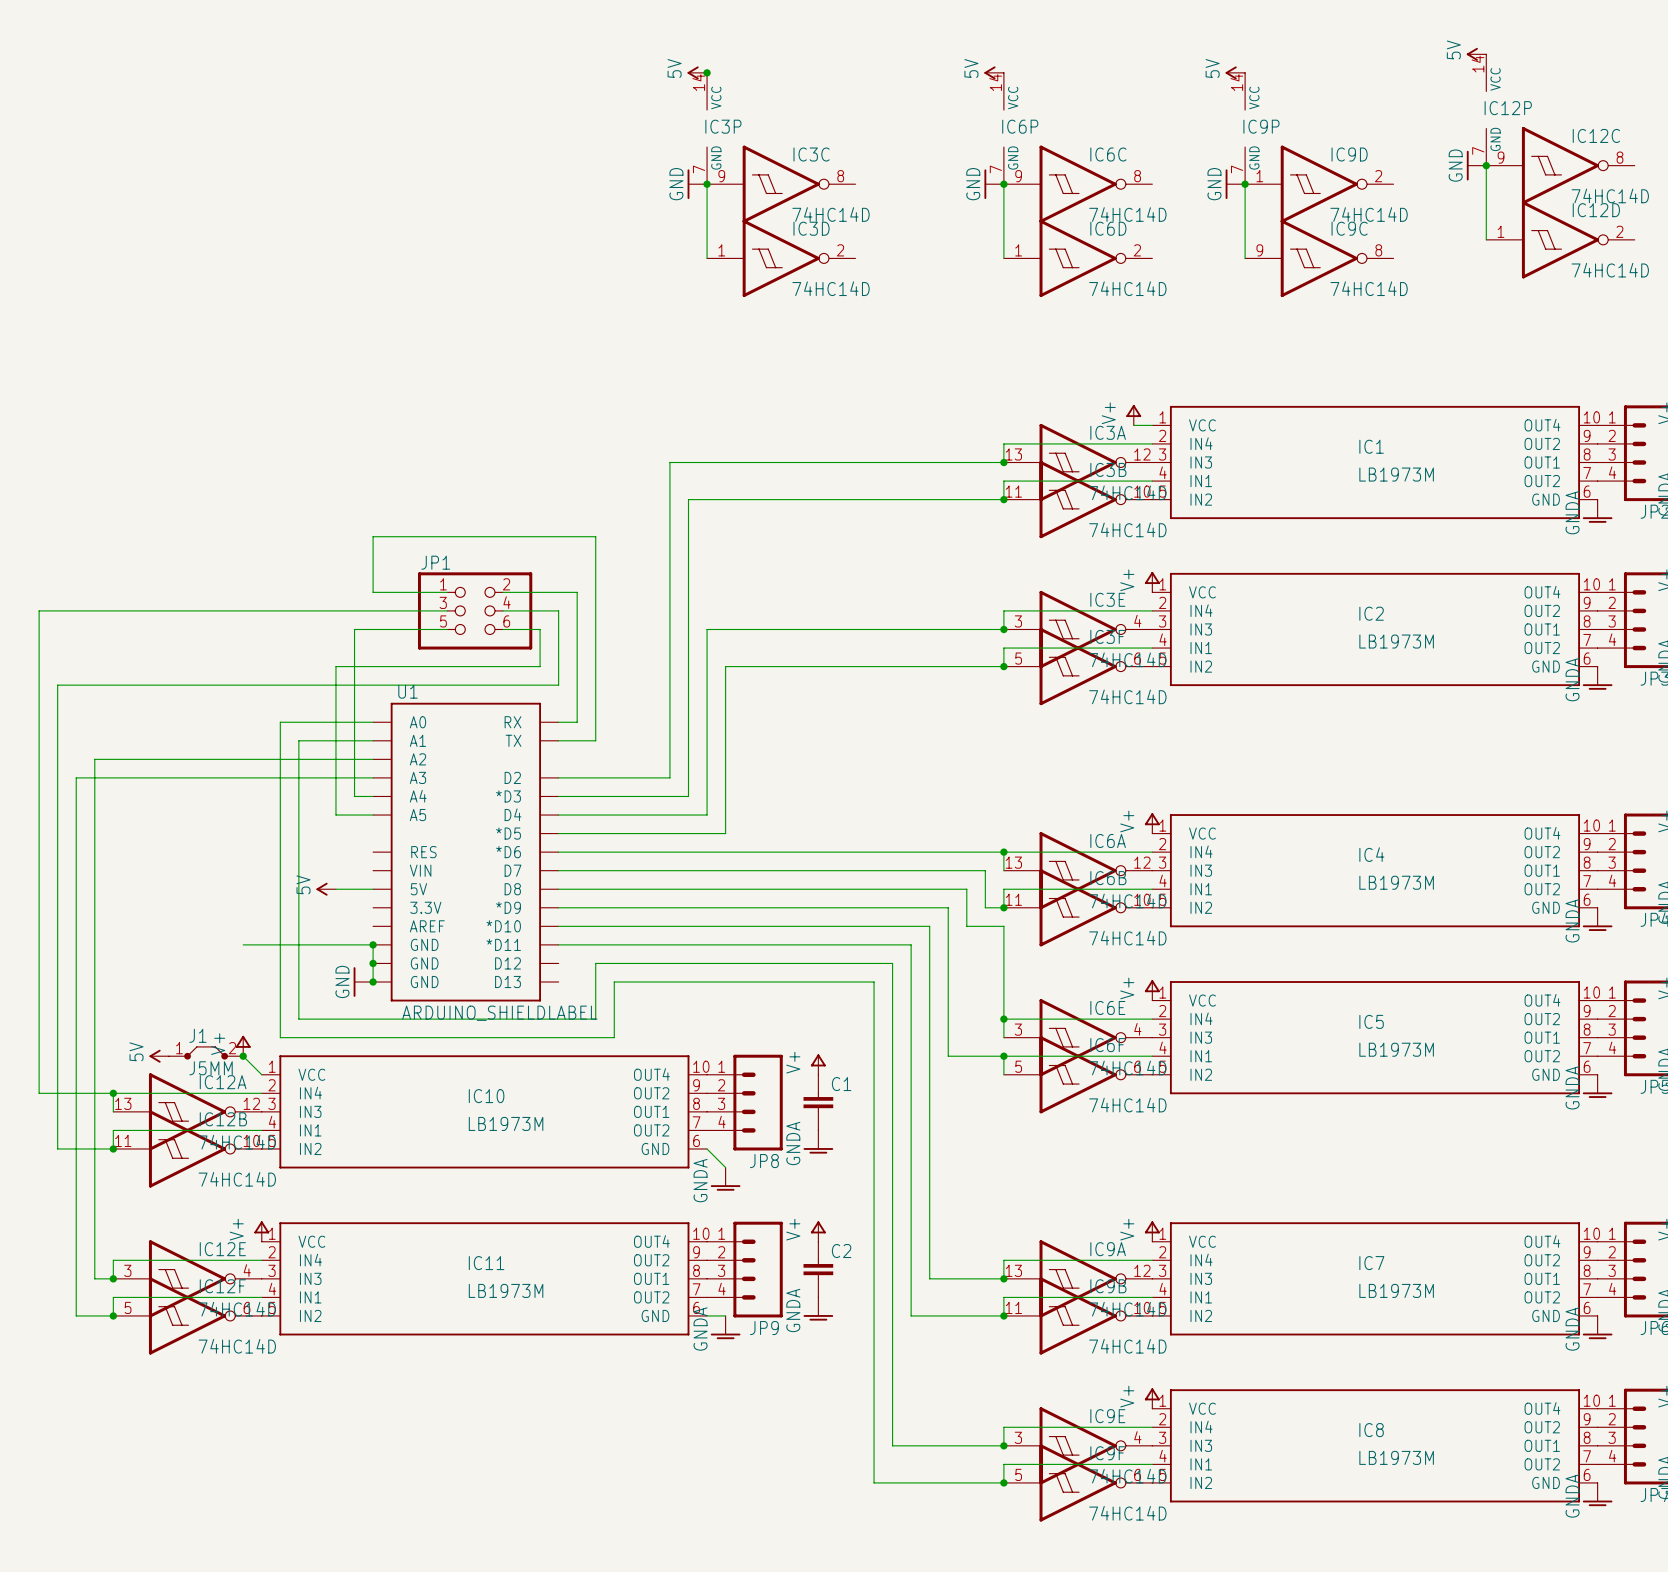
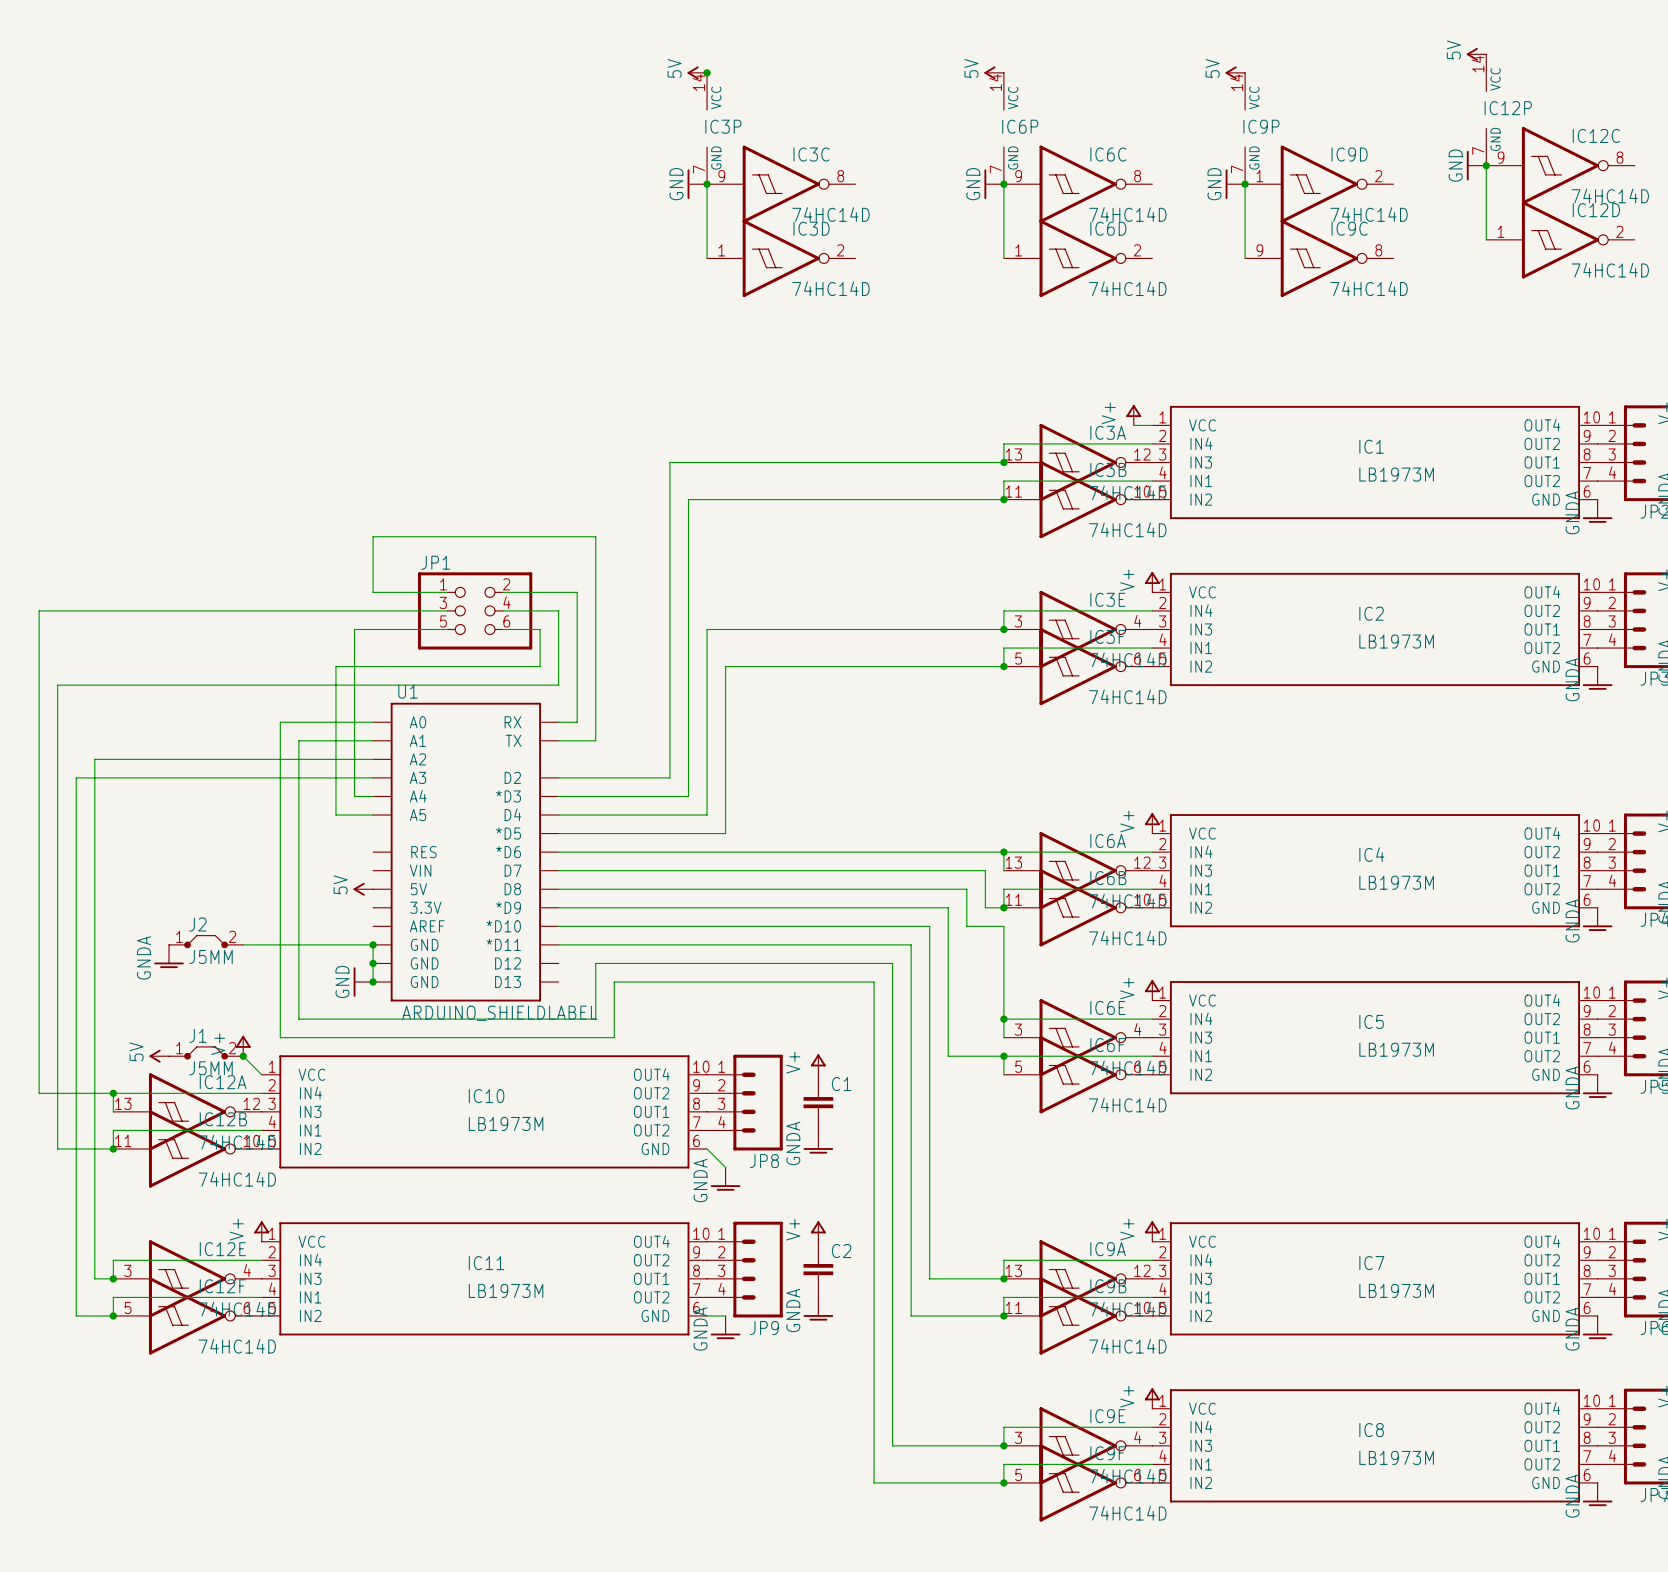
power symbol position: 5V (326, 889) -> 5V (363, 889)
J2: none -> J5MM (206, 941)
power symbol: none -> GNDA (168, 956)

